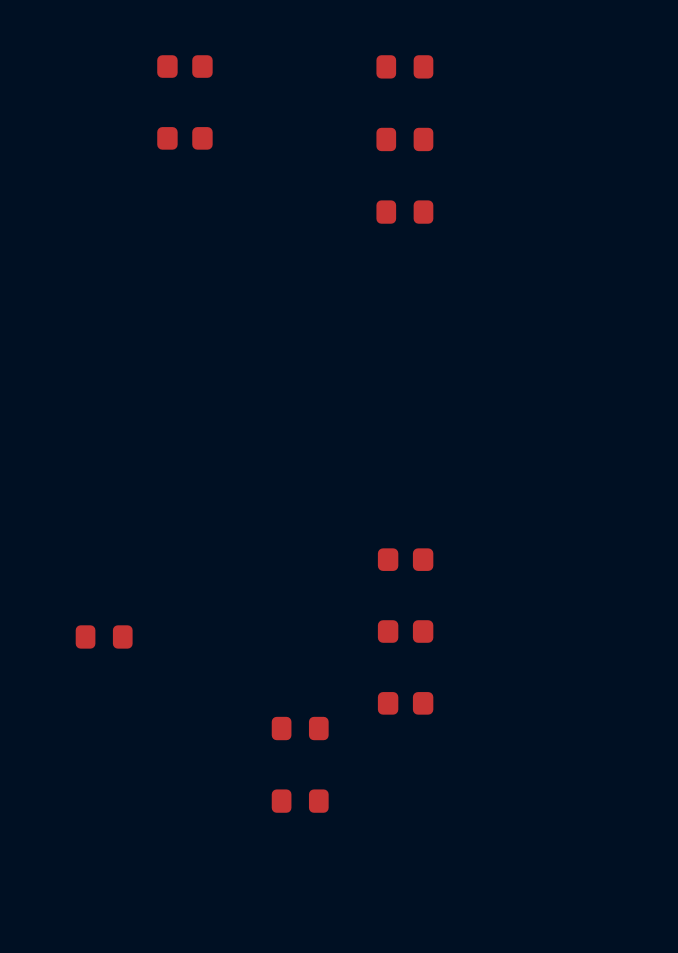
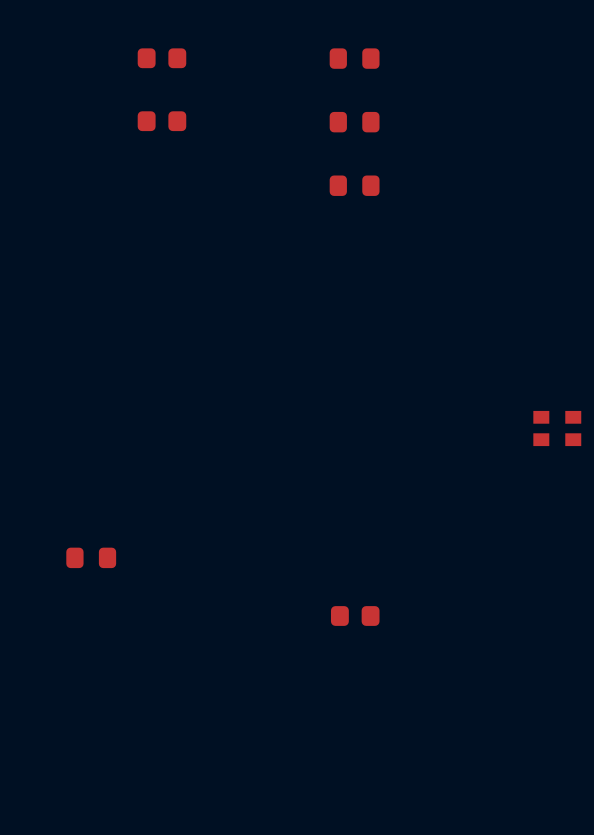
part: none -> (557, 428)
part: (405, 559) -> none
part: (405, 631) -> none
part: (300, 728) -> none
part: (300, 801) -> none

